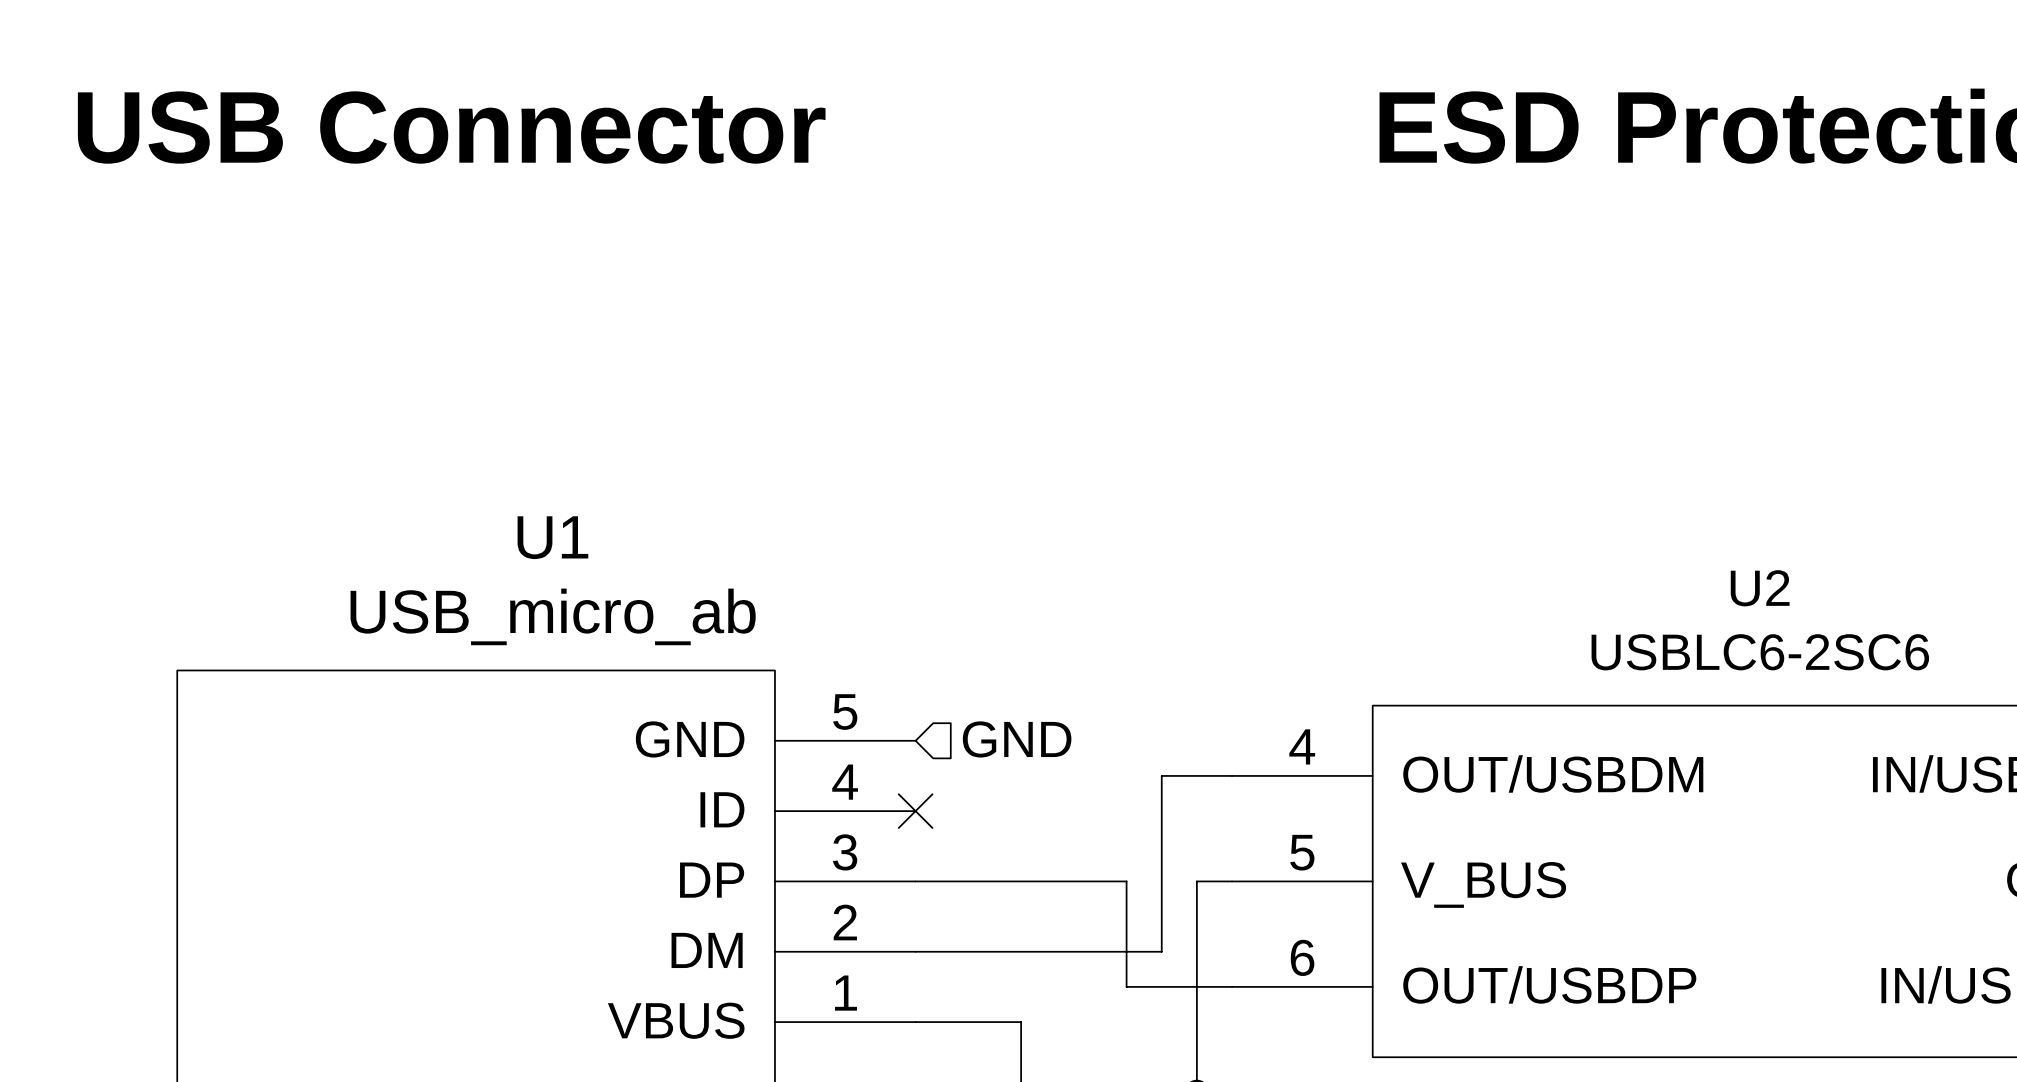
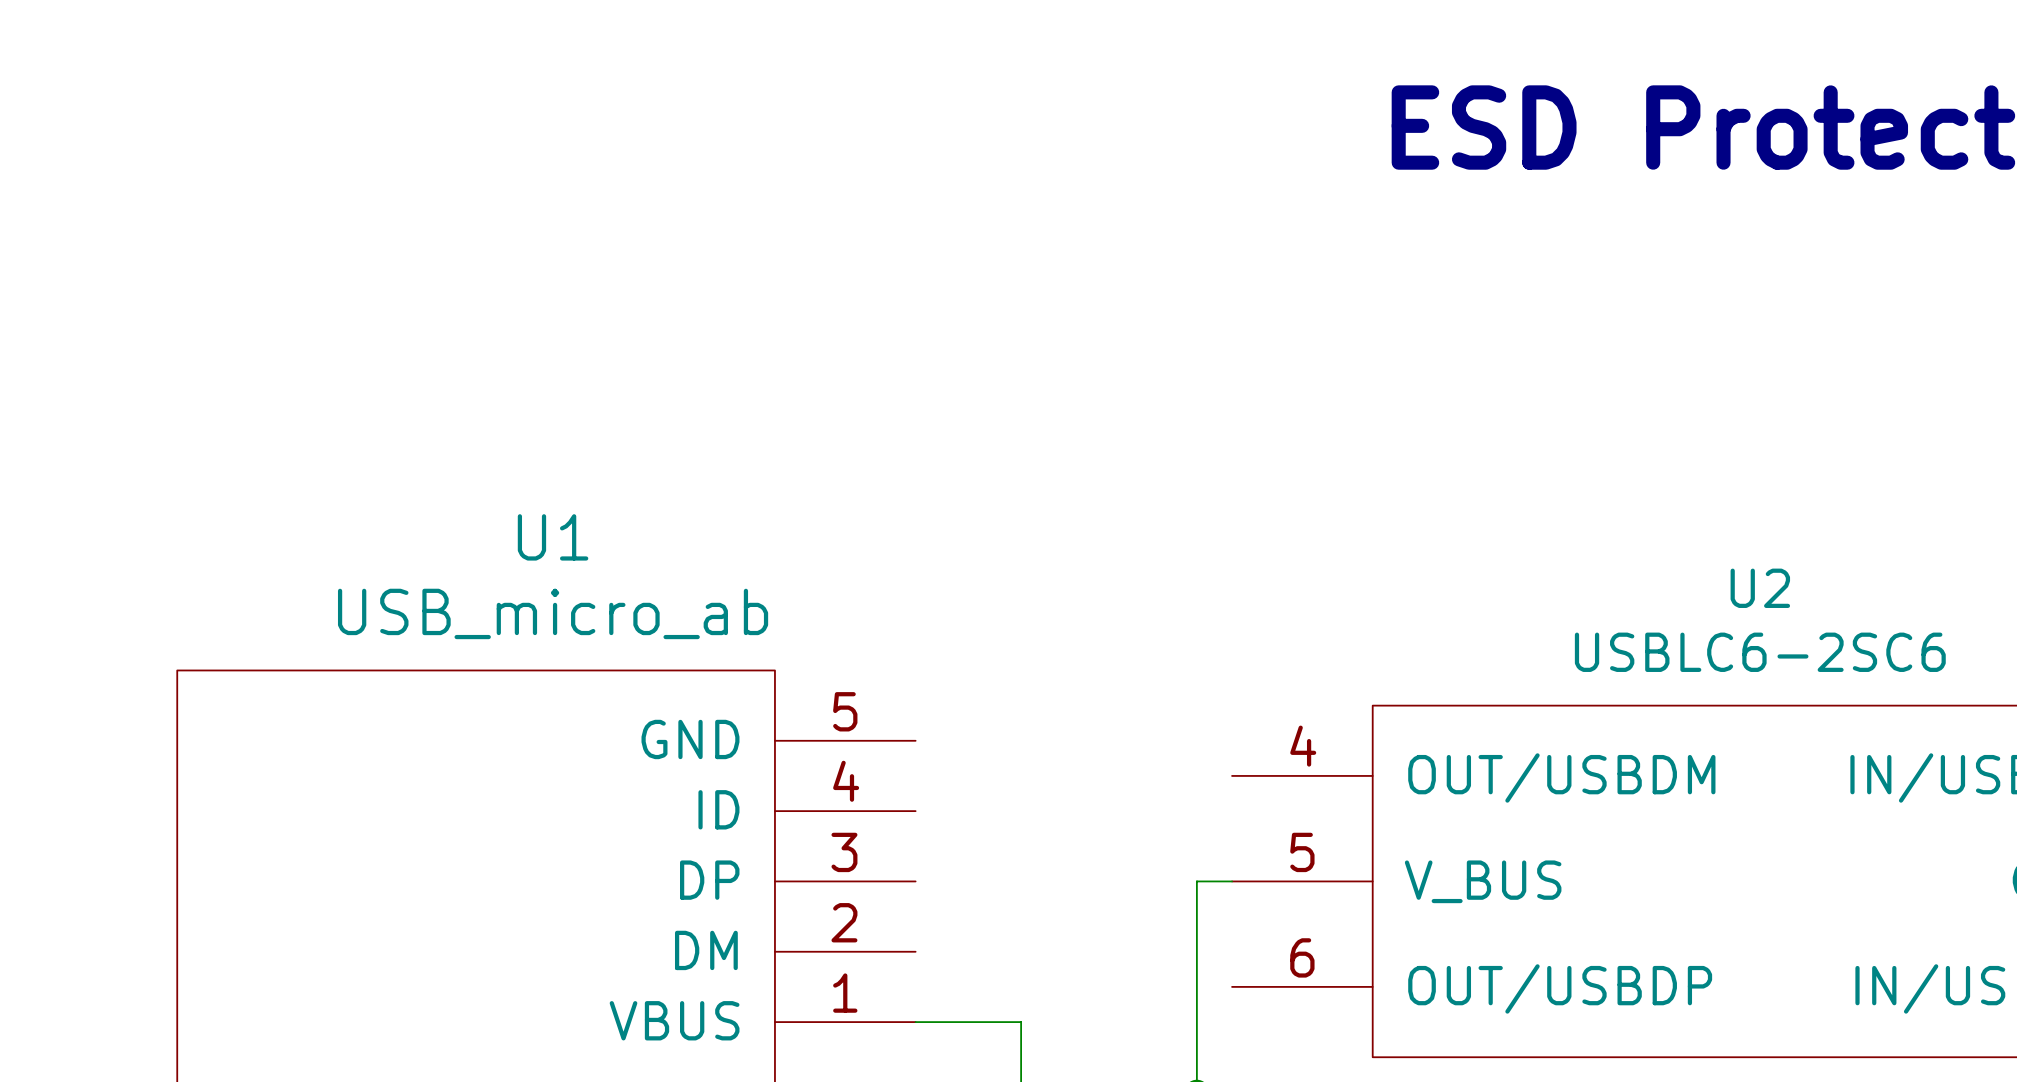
text: USB Connector (451, 127) -> none
hierarchical label: GND (1017, 739) -> none
wire: (1232, 775) (1161, 775) (1161, 951) (915, 951) -> none
no-connect mark: (915, 811) -> none
wire: (915, 881) (1126, 881) (1126, 986) (1232, 986) -> none

